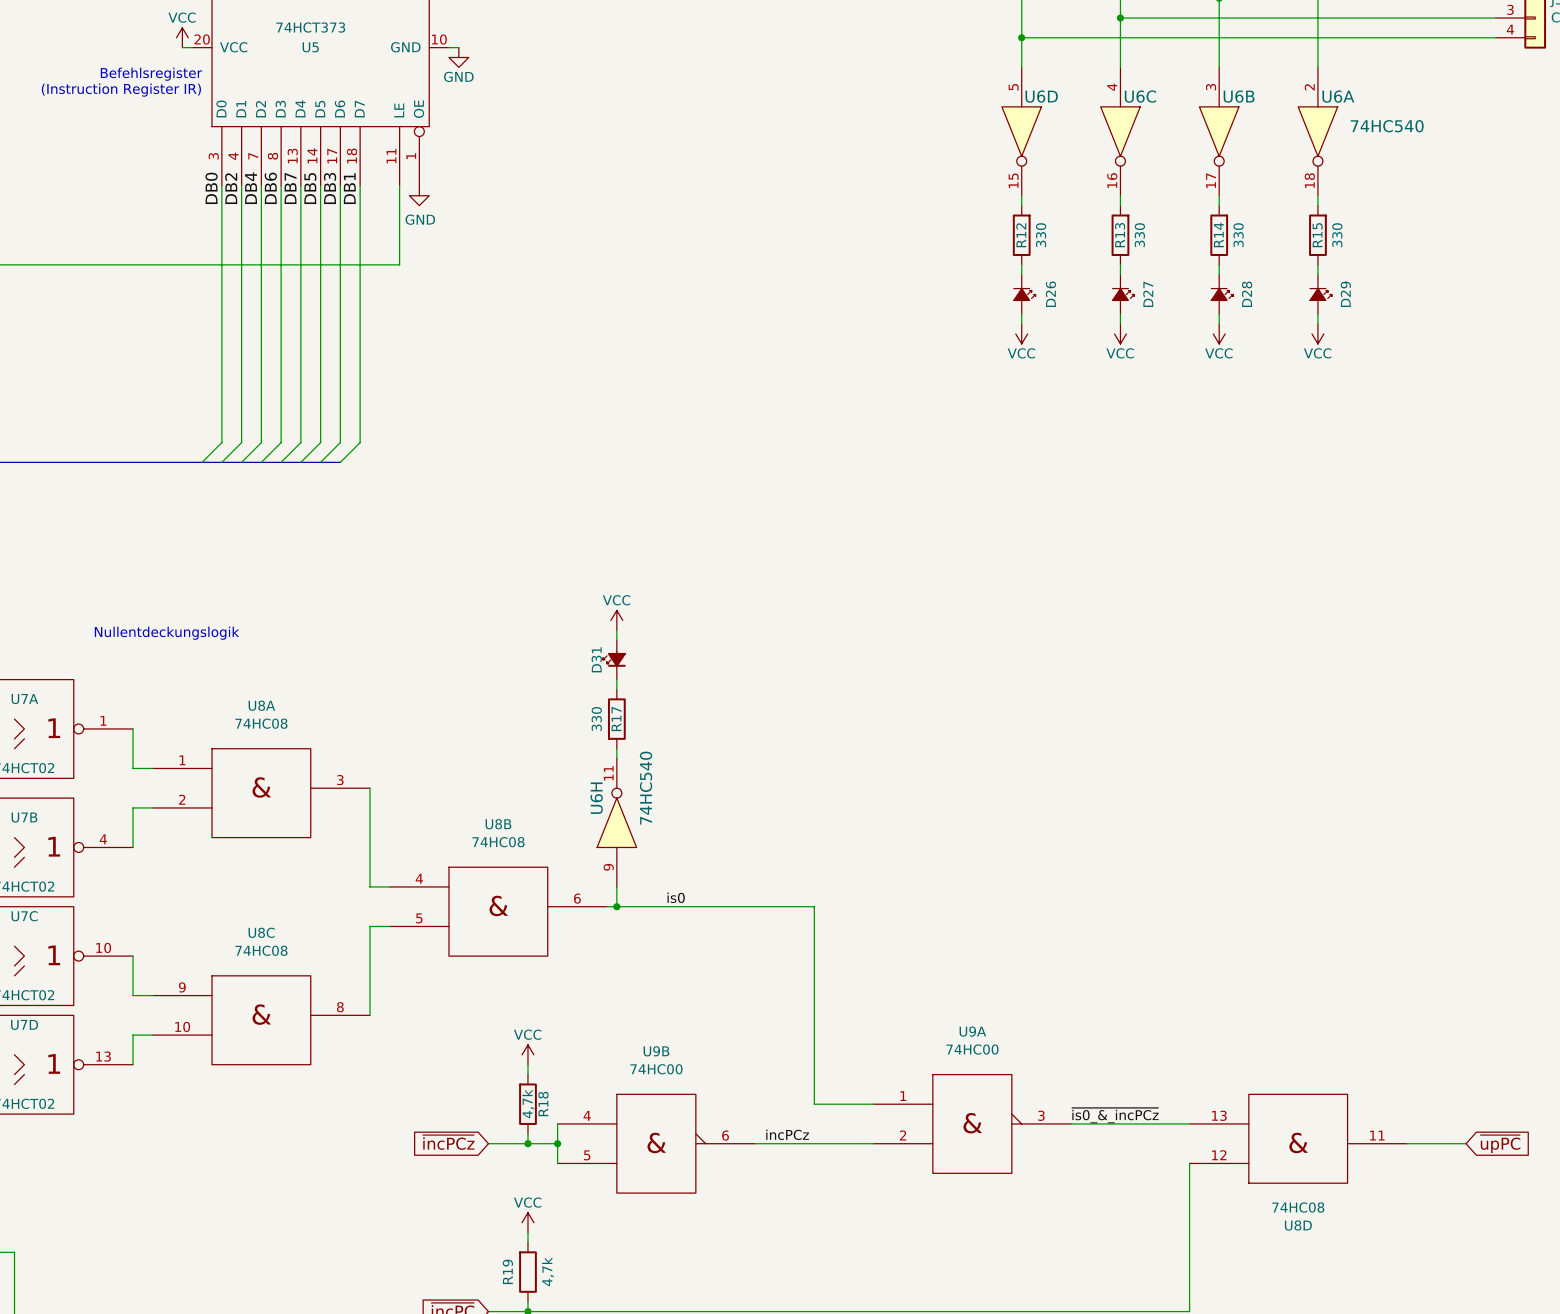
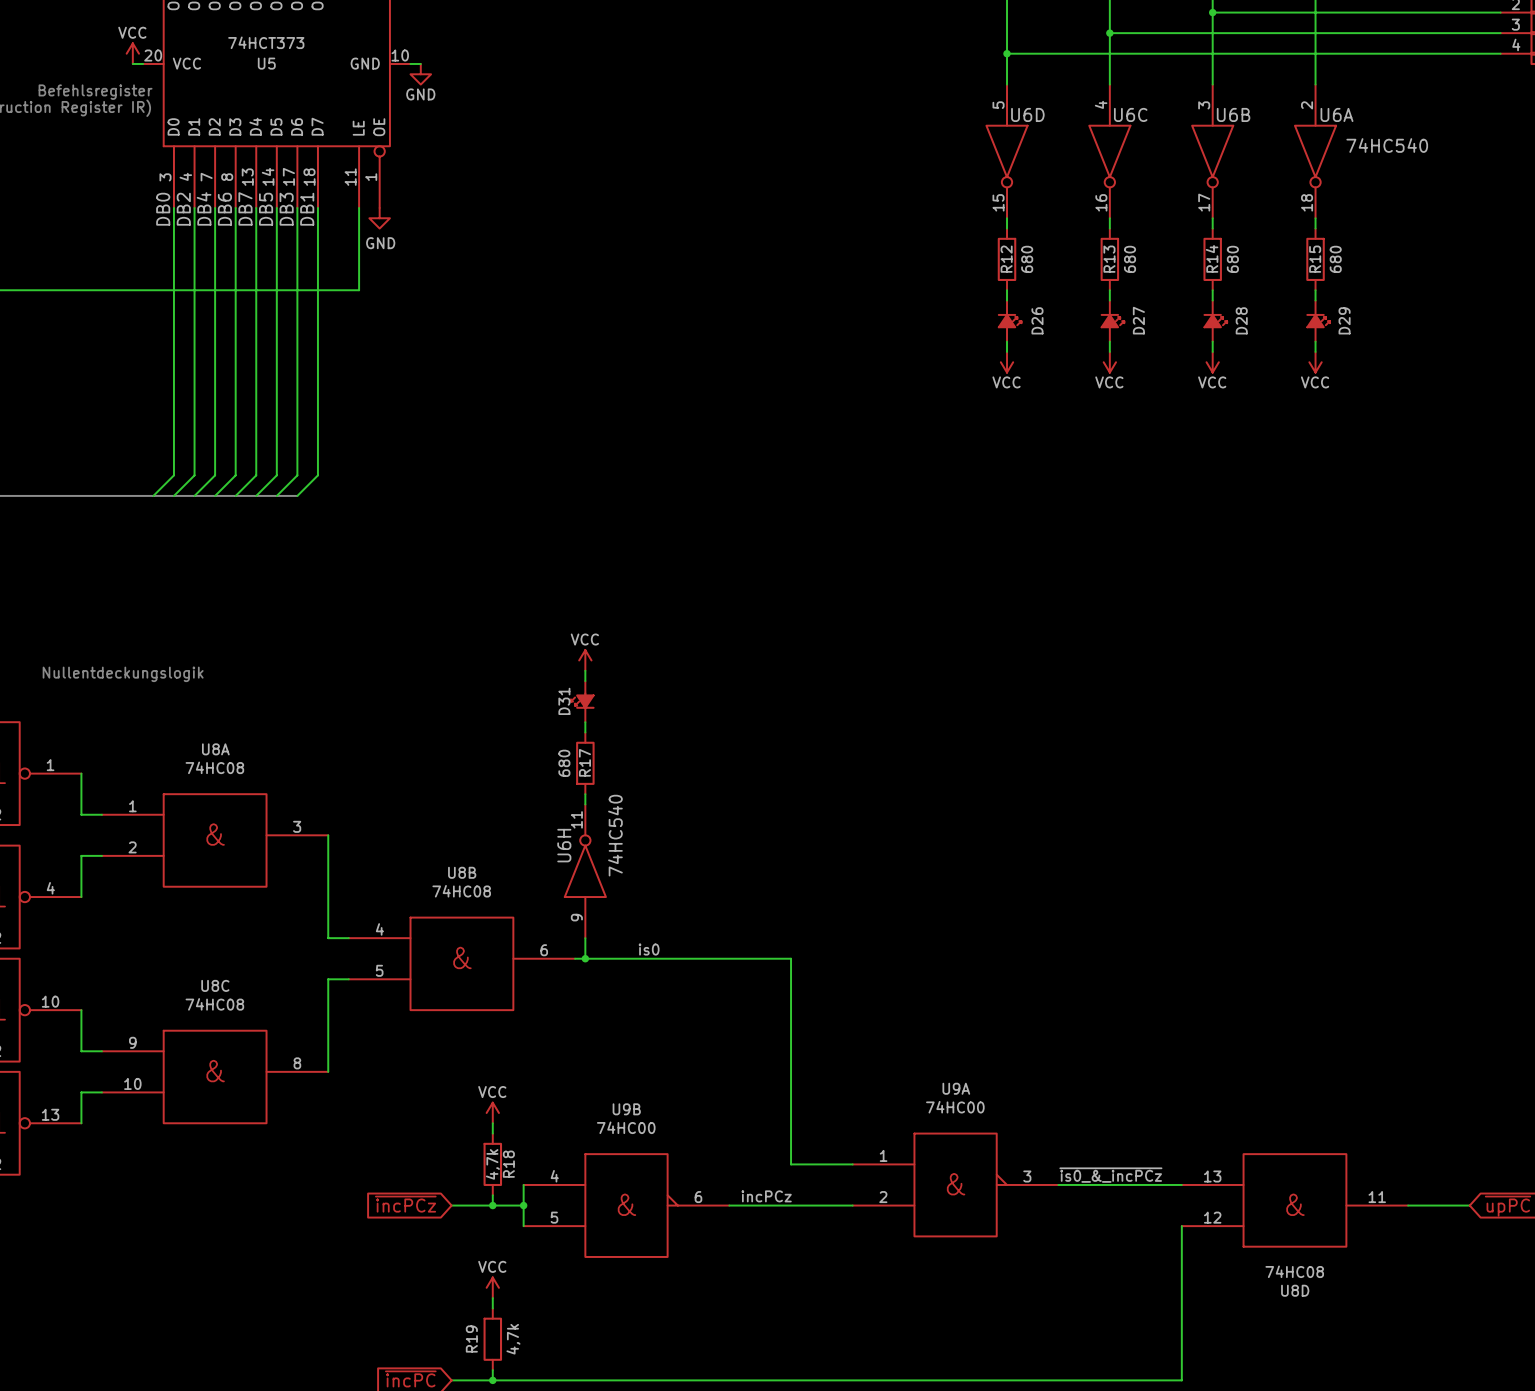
R12 value: 330 (1041, 235) -> 680 (1027, 259)
R13 value: 330 (1139, 235) -> 680 (1130, 259)
R14 value: 330 (1238, 235) -> 680 (1232, 259)
R15 value: 330 (1337, 235) -> 680 (1335, 259)
R17 value: 330 (596, 719) -> 680 (564, 763)

